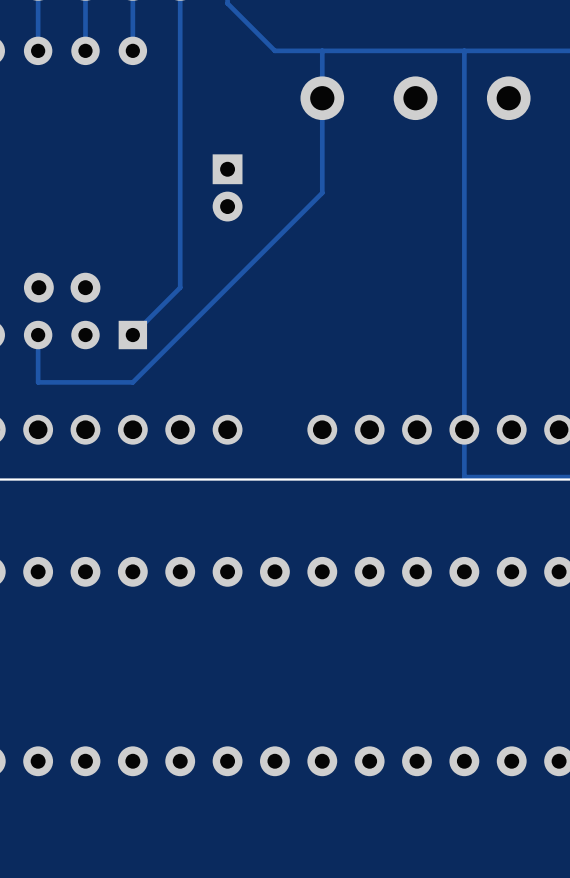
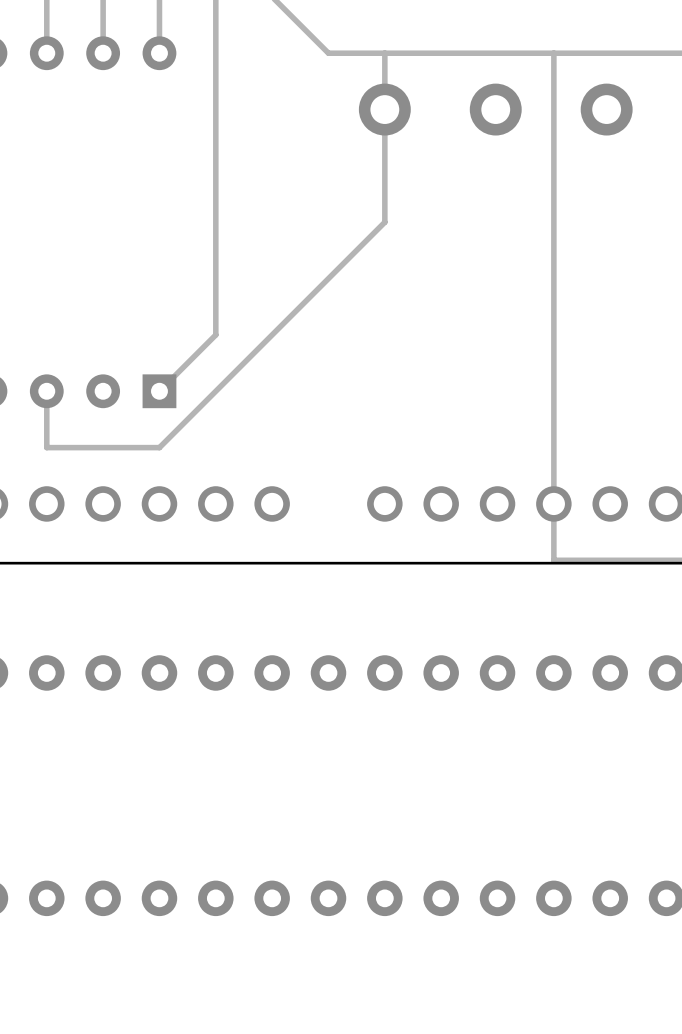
part: (227, 187) -> none
part: (62, 287) -> none

